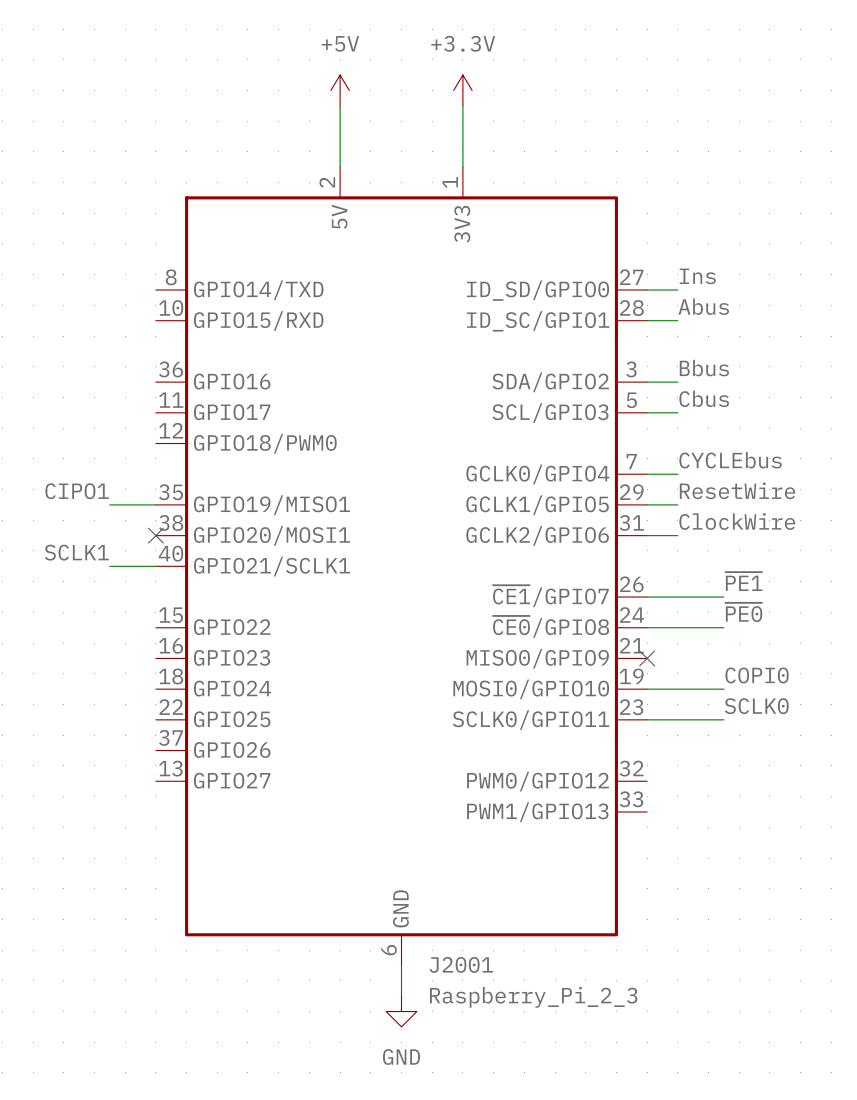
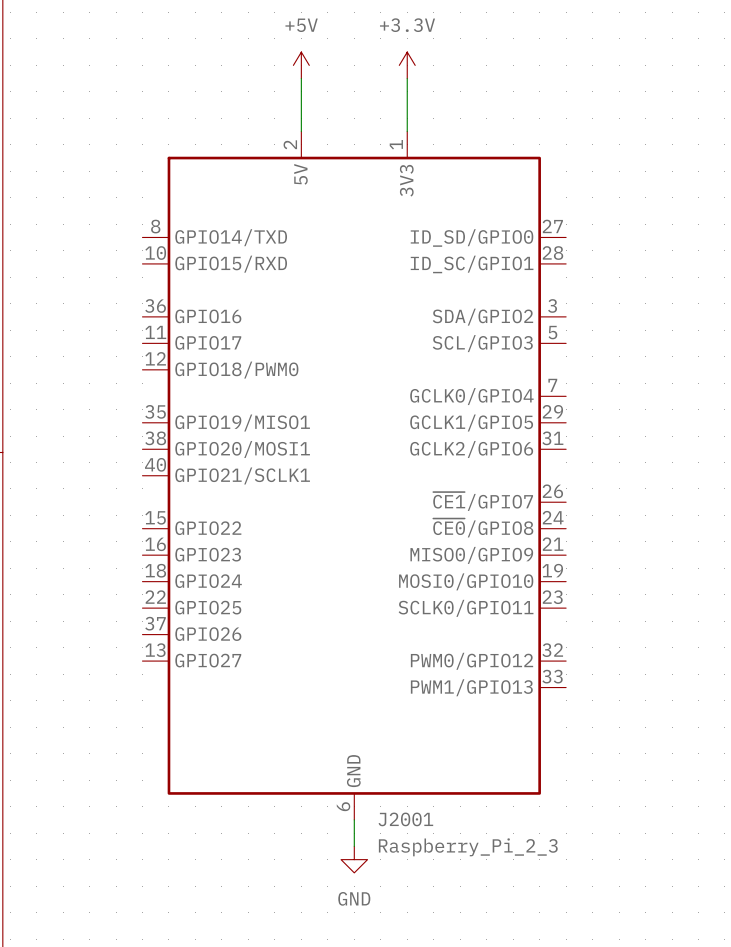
label: Ins (697, 276) -> none
wire: (647, 289) (677, 289) -> none
label: Abus (703, 306) -> none
wire: (647, 320) (677, 320) -> none
label: Bbus (704, 368) -> none
wire: (647, 382) (677, 382) -> none
label: Cbus (704, 398) -> none
wire: (647, 412) (677, 412) -> none
label: CYCLEbus (730, 460) -> none
wire: (647, 474) (677, 474) -> none
label: ResetWire (737, 490) -> none
label: CIPO1 (77, 491) -> none
wire: (109, 504) (155, 504) -> none
wire: (647, 504) (677, 504) -> none
label: ClockWire (737, 521) -> none
no-connect mark: (155, 535) -> none
wire: (647, 535) (677, 535) -> none
label: SCLK1 (76, 552) -> none
wire: (109, 566) (155, 566) -> none
label: ~{PE1} (743, 581) -> none
wire: (647, 597) (723, 597) -> none
label: ~{PE0} (743, 612) -> none
wire: (647, 627) (723, 627) -> none
no-connect mark: (647, 658) -> none
label: COPI0 (757, 675) -> none
wire: (647, 689) (723, 689) -> none
label: SCLK0 (756, 706) -> none
wire: (647, 719) (723, 719) -> none

